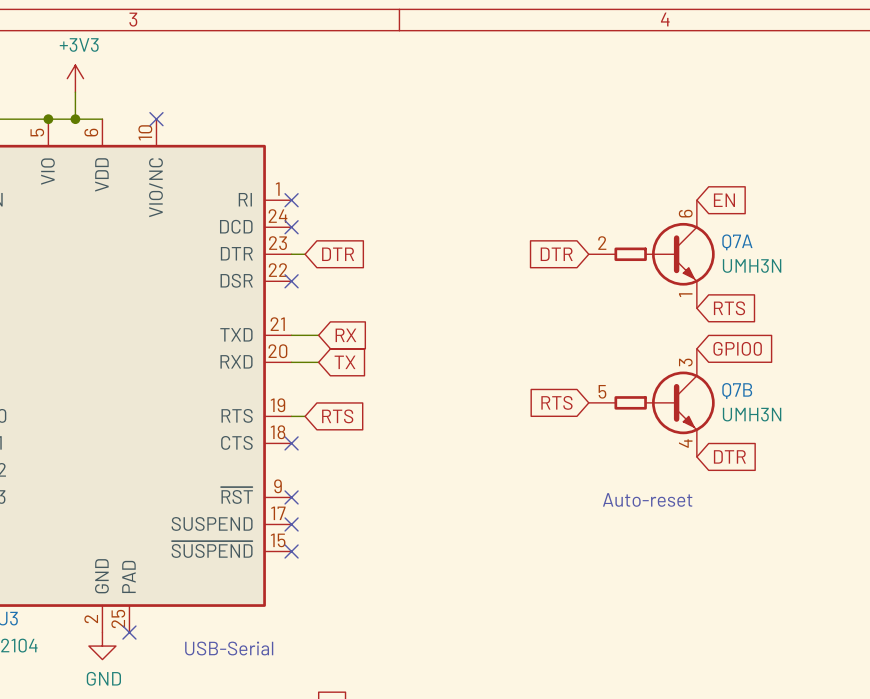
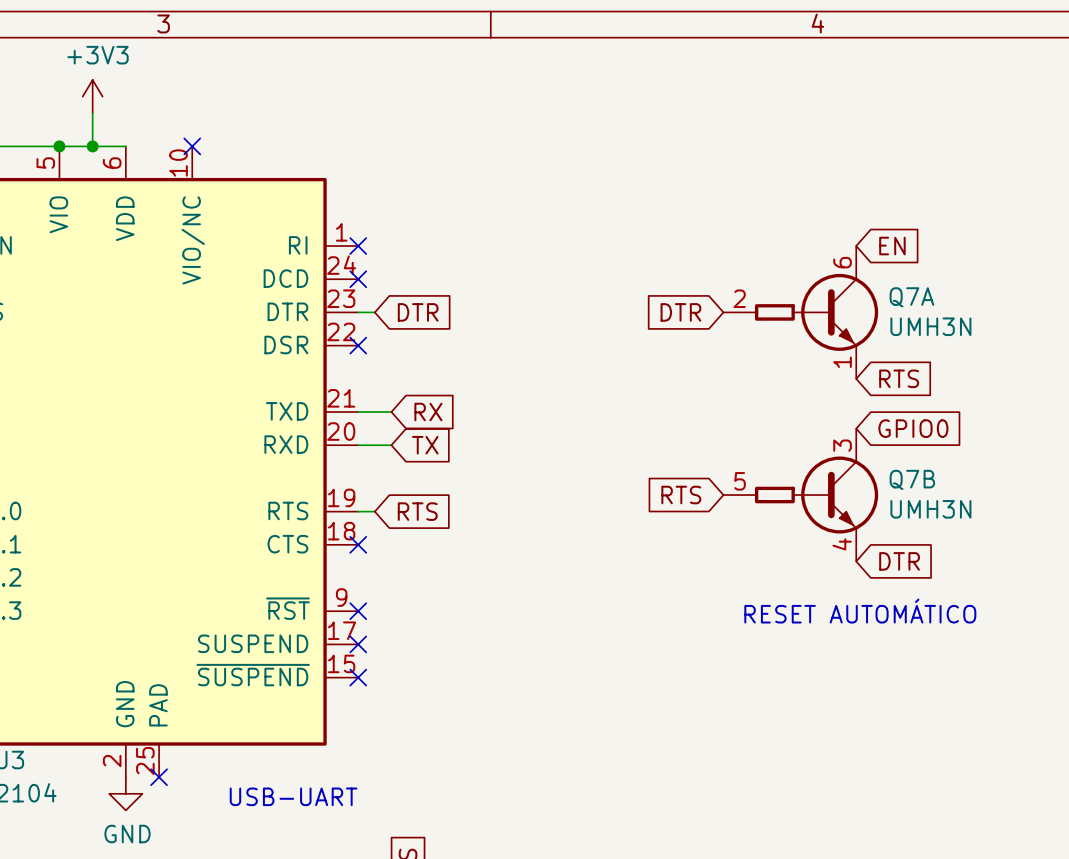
text: Auto-reset (647, 499) -> RESET AUTOMÁTICO (860, 611)
text: USB-Serial (229, 648) -> USB-UART (293, 796)

